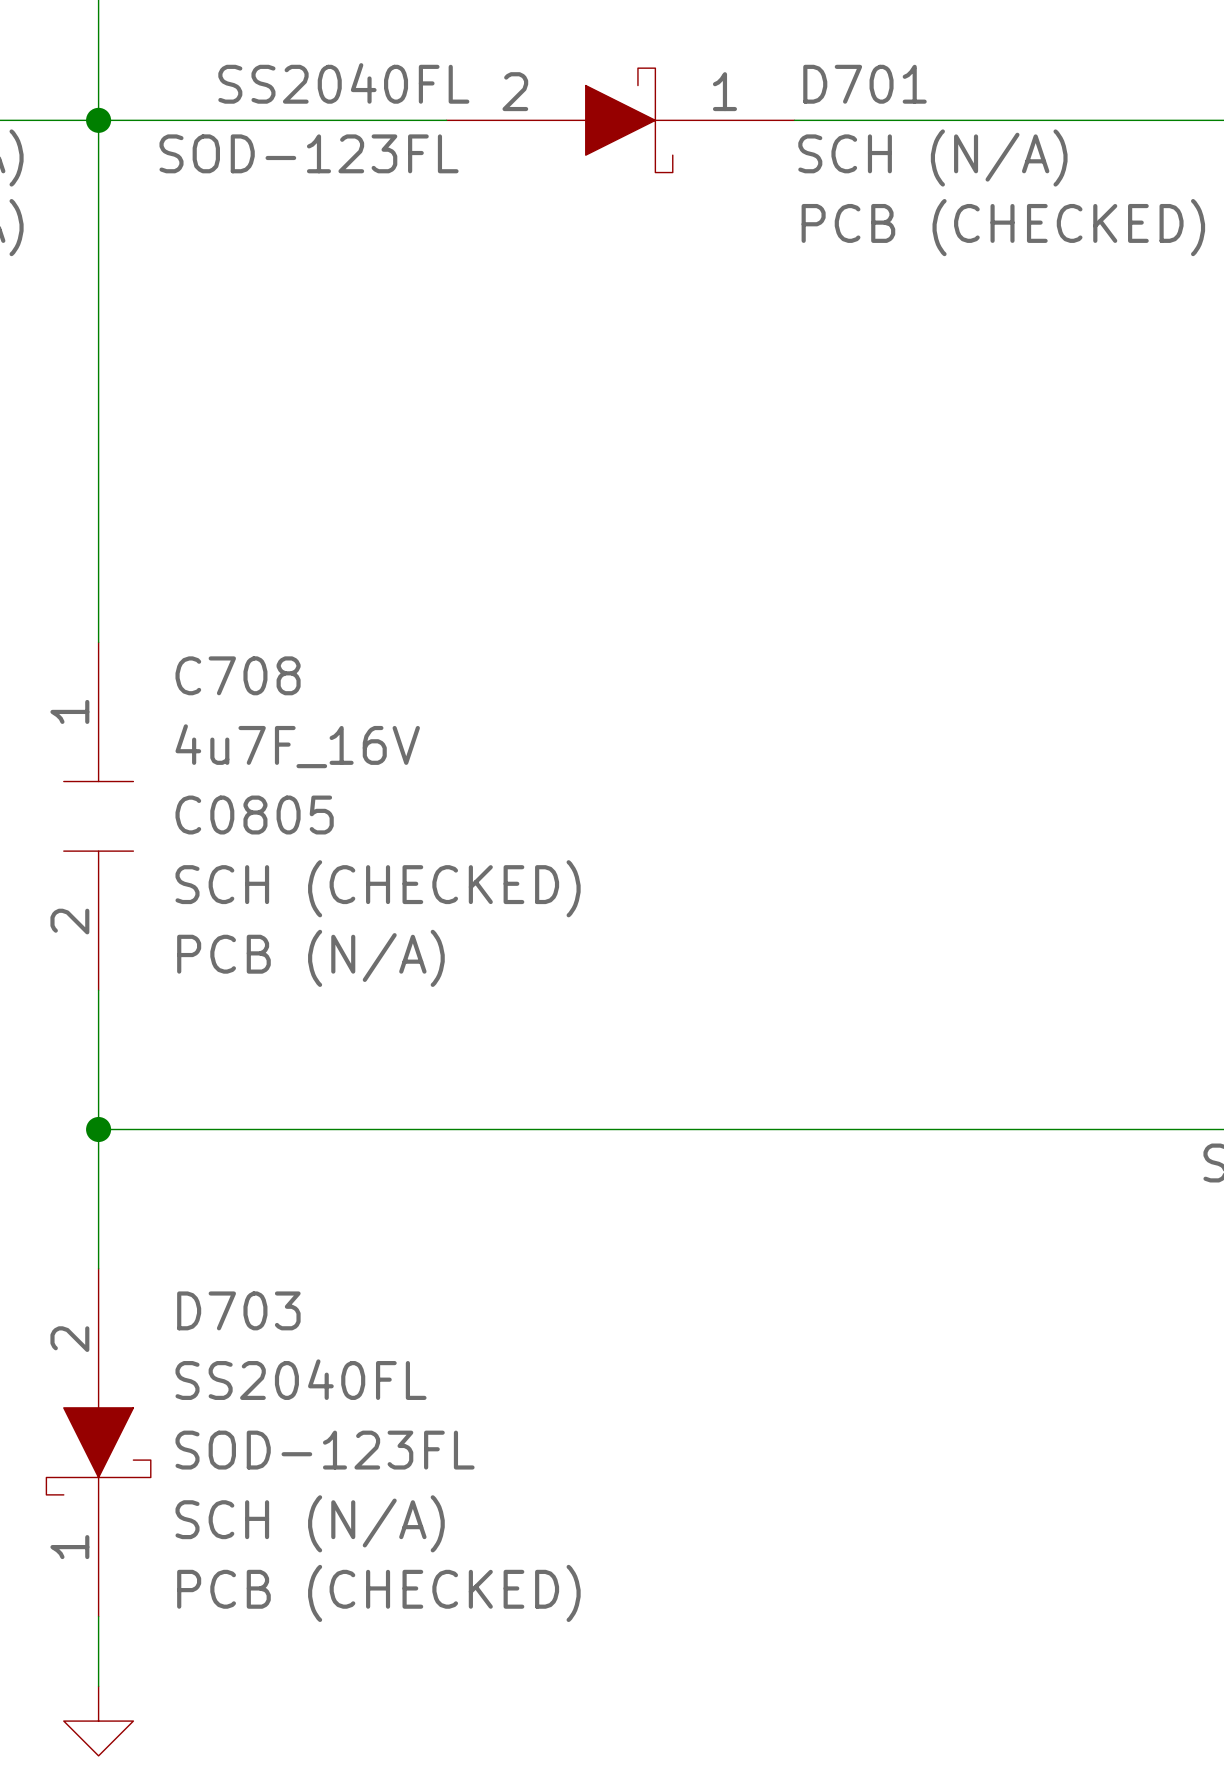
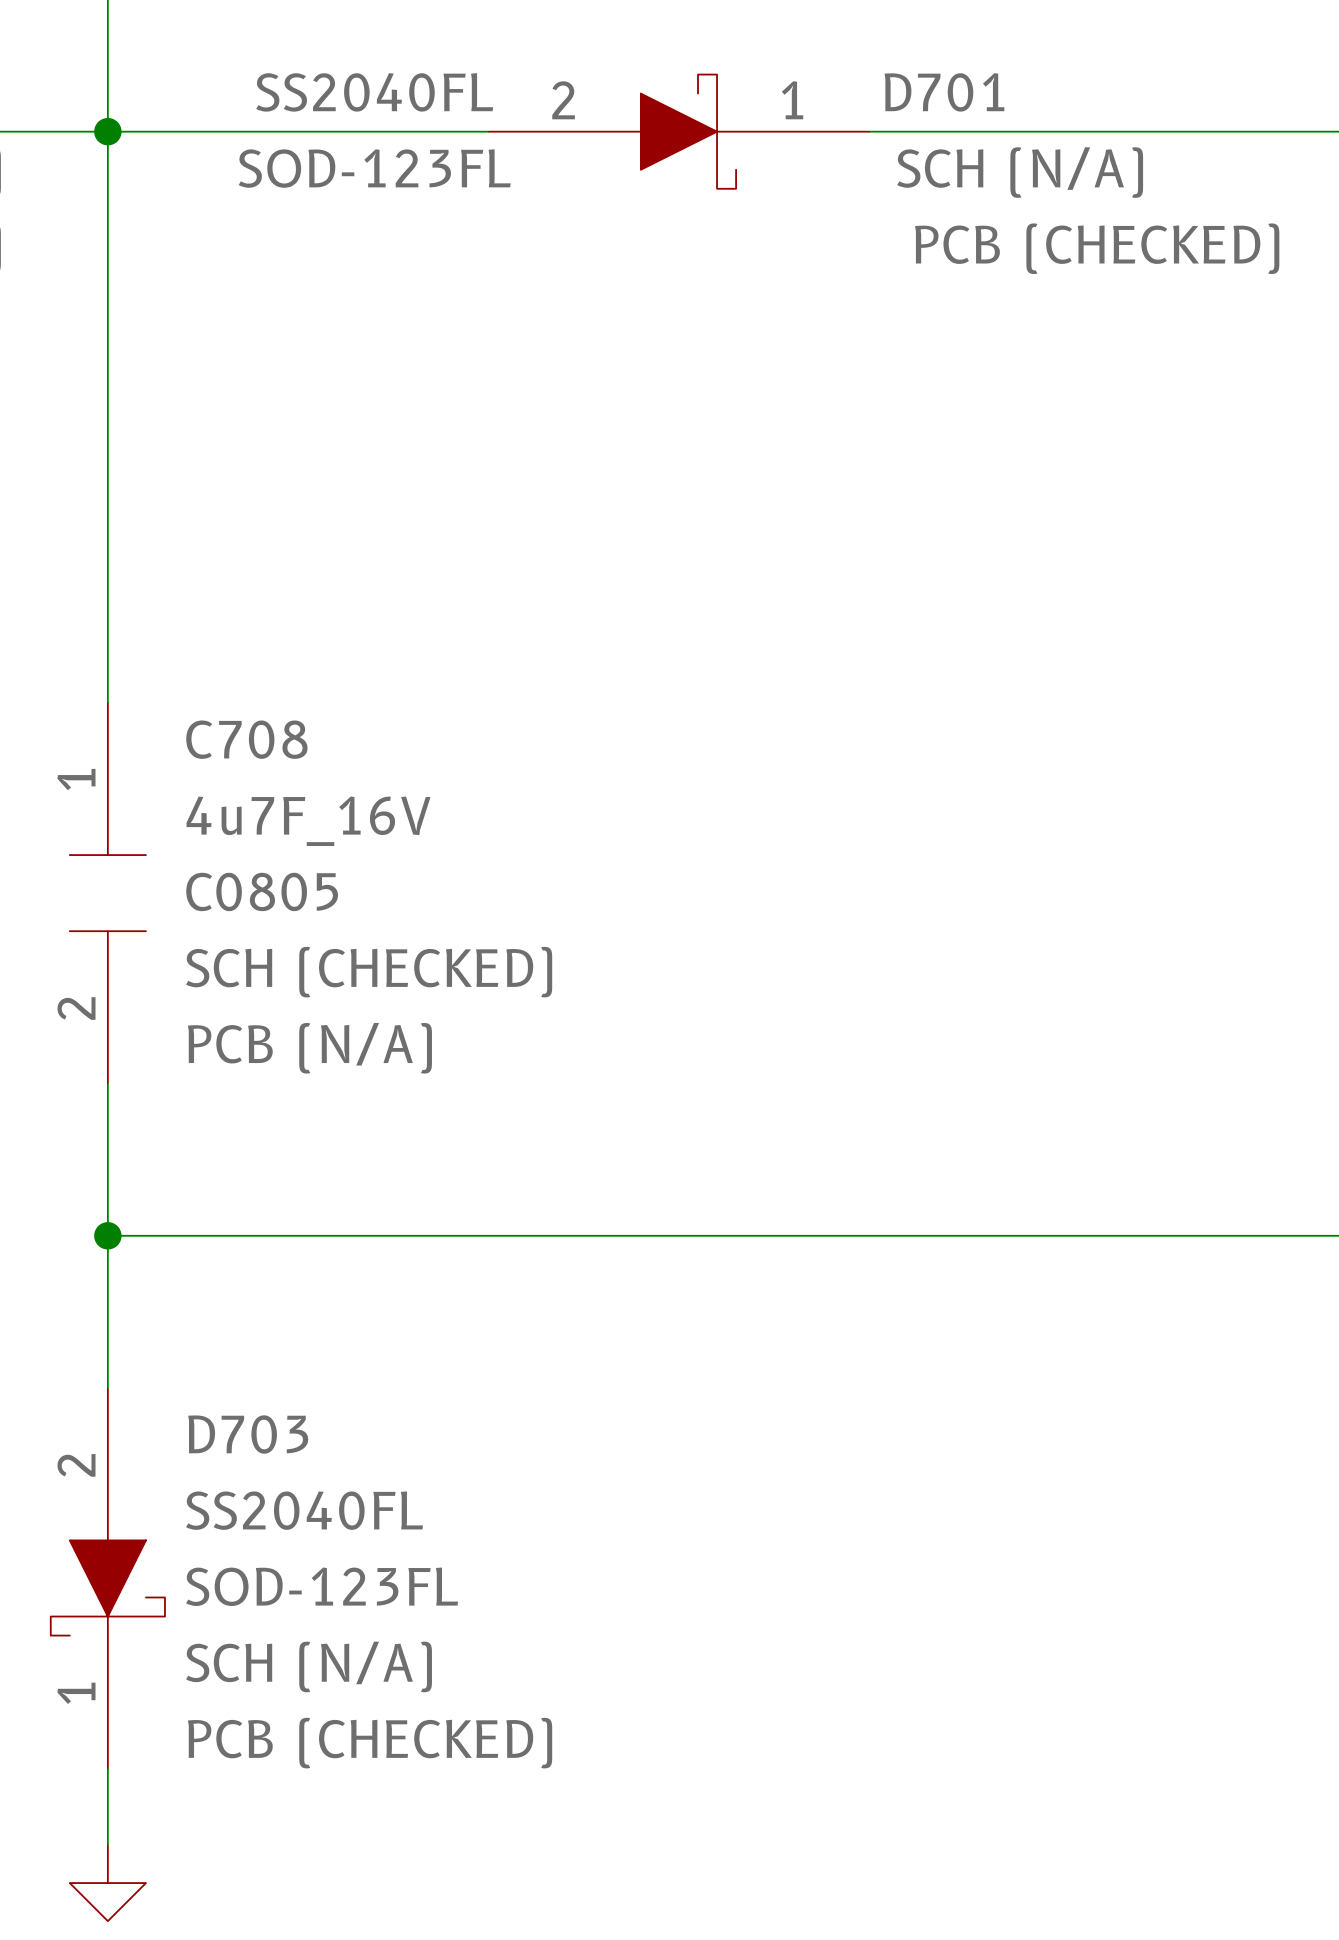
D701 text position: SOD-123FL (309, 153) -> SOD-123FL (374, 168)

